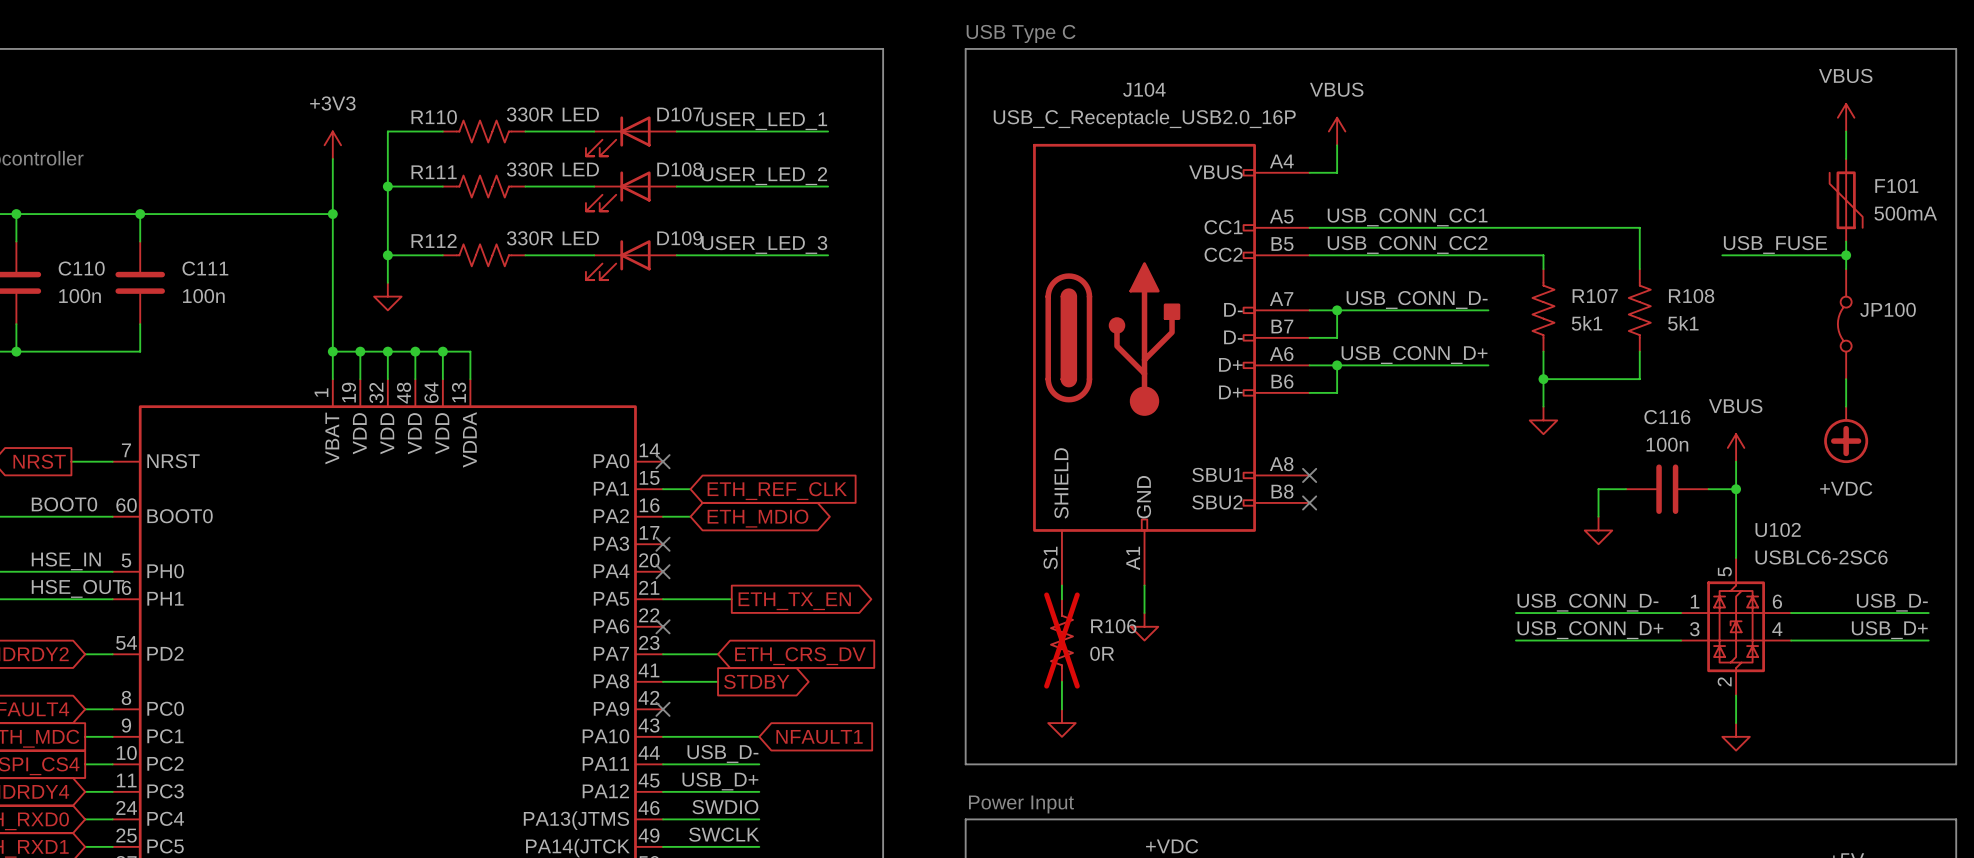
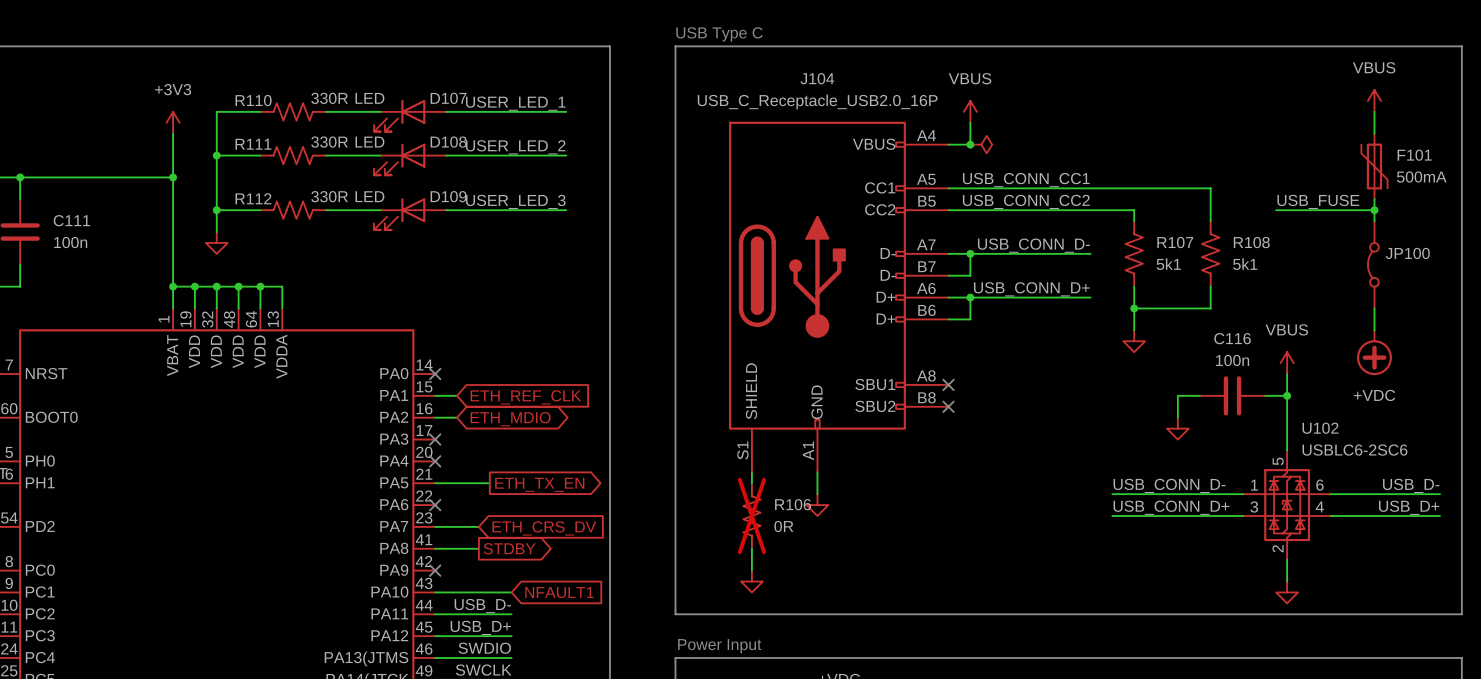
junction: none -> (970, 144)
power symbol: none -> (981, 144)

